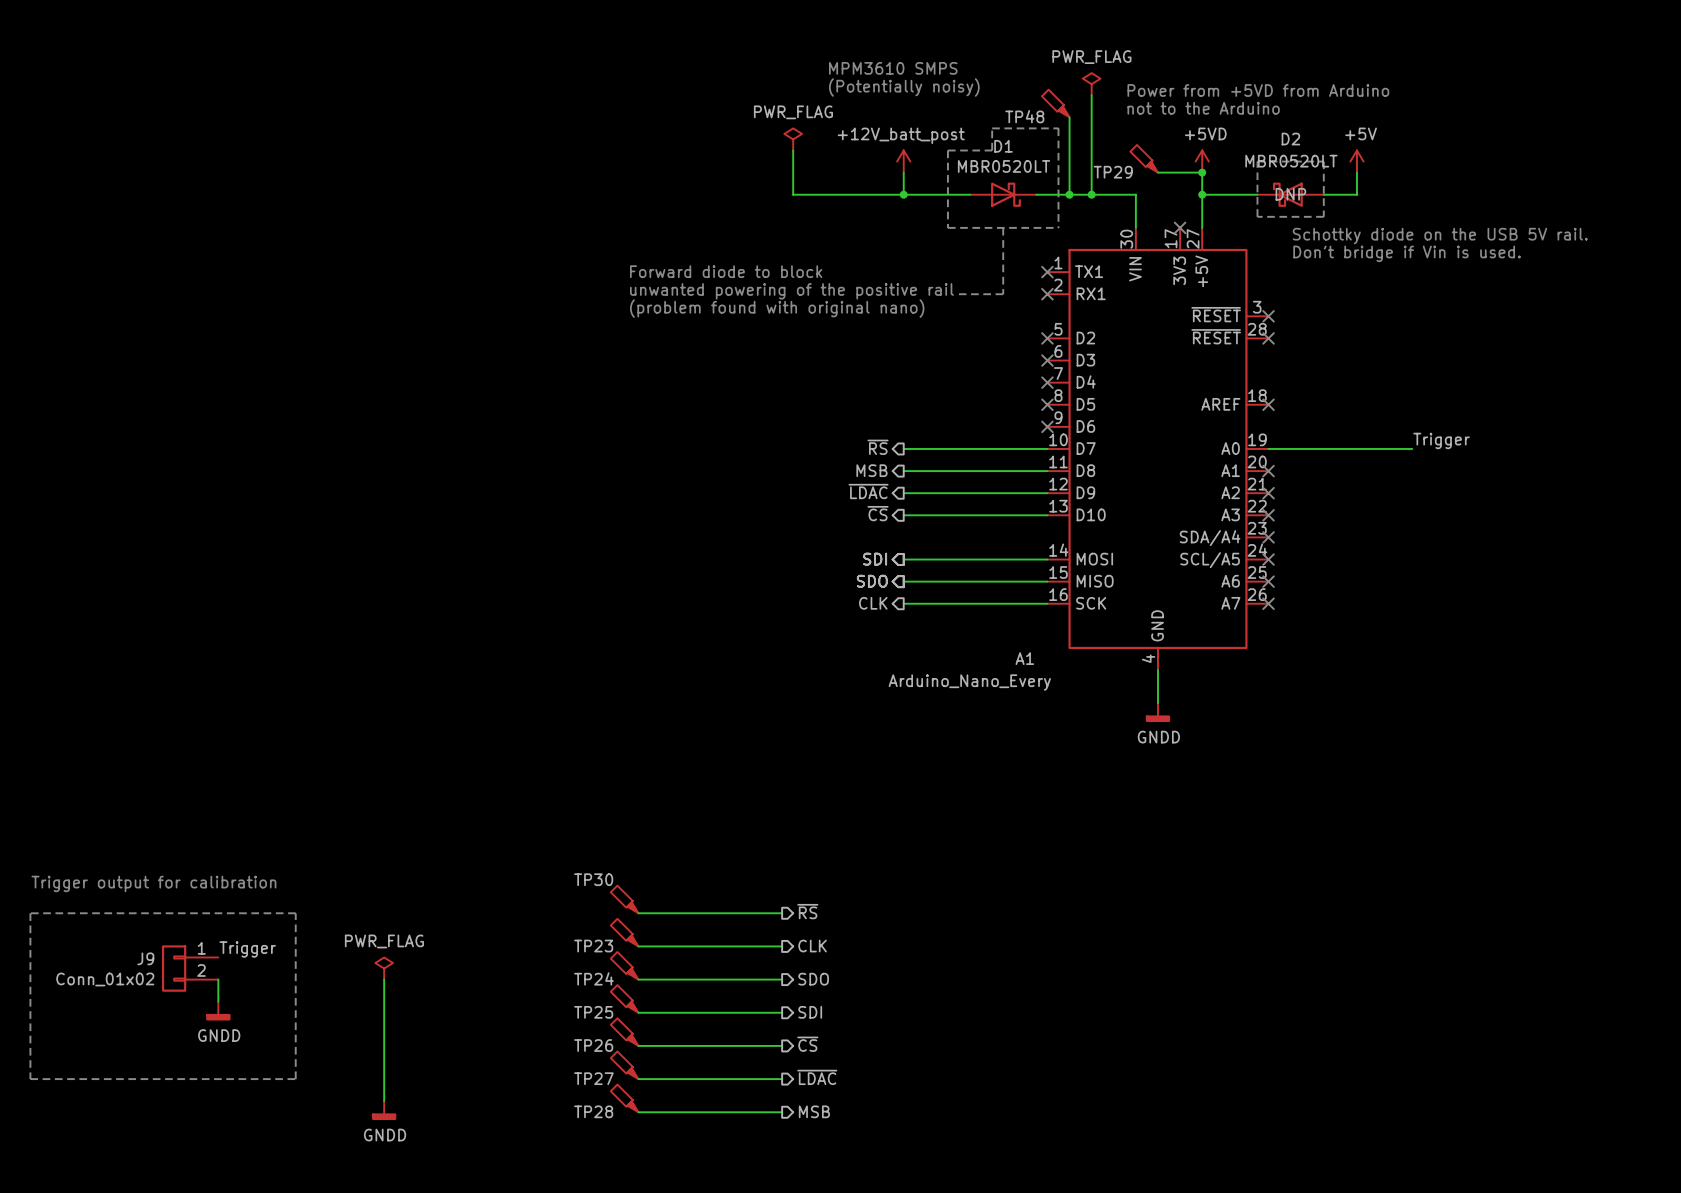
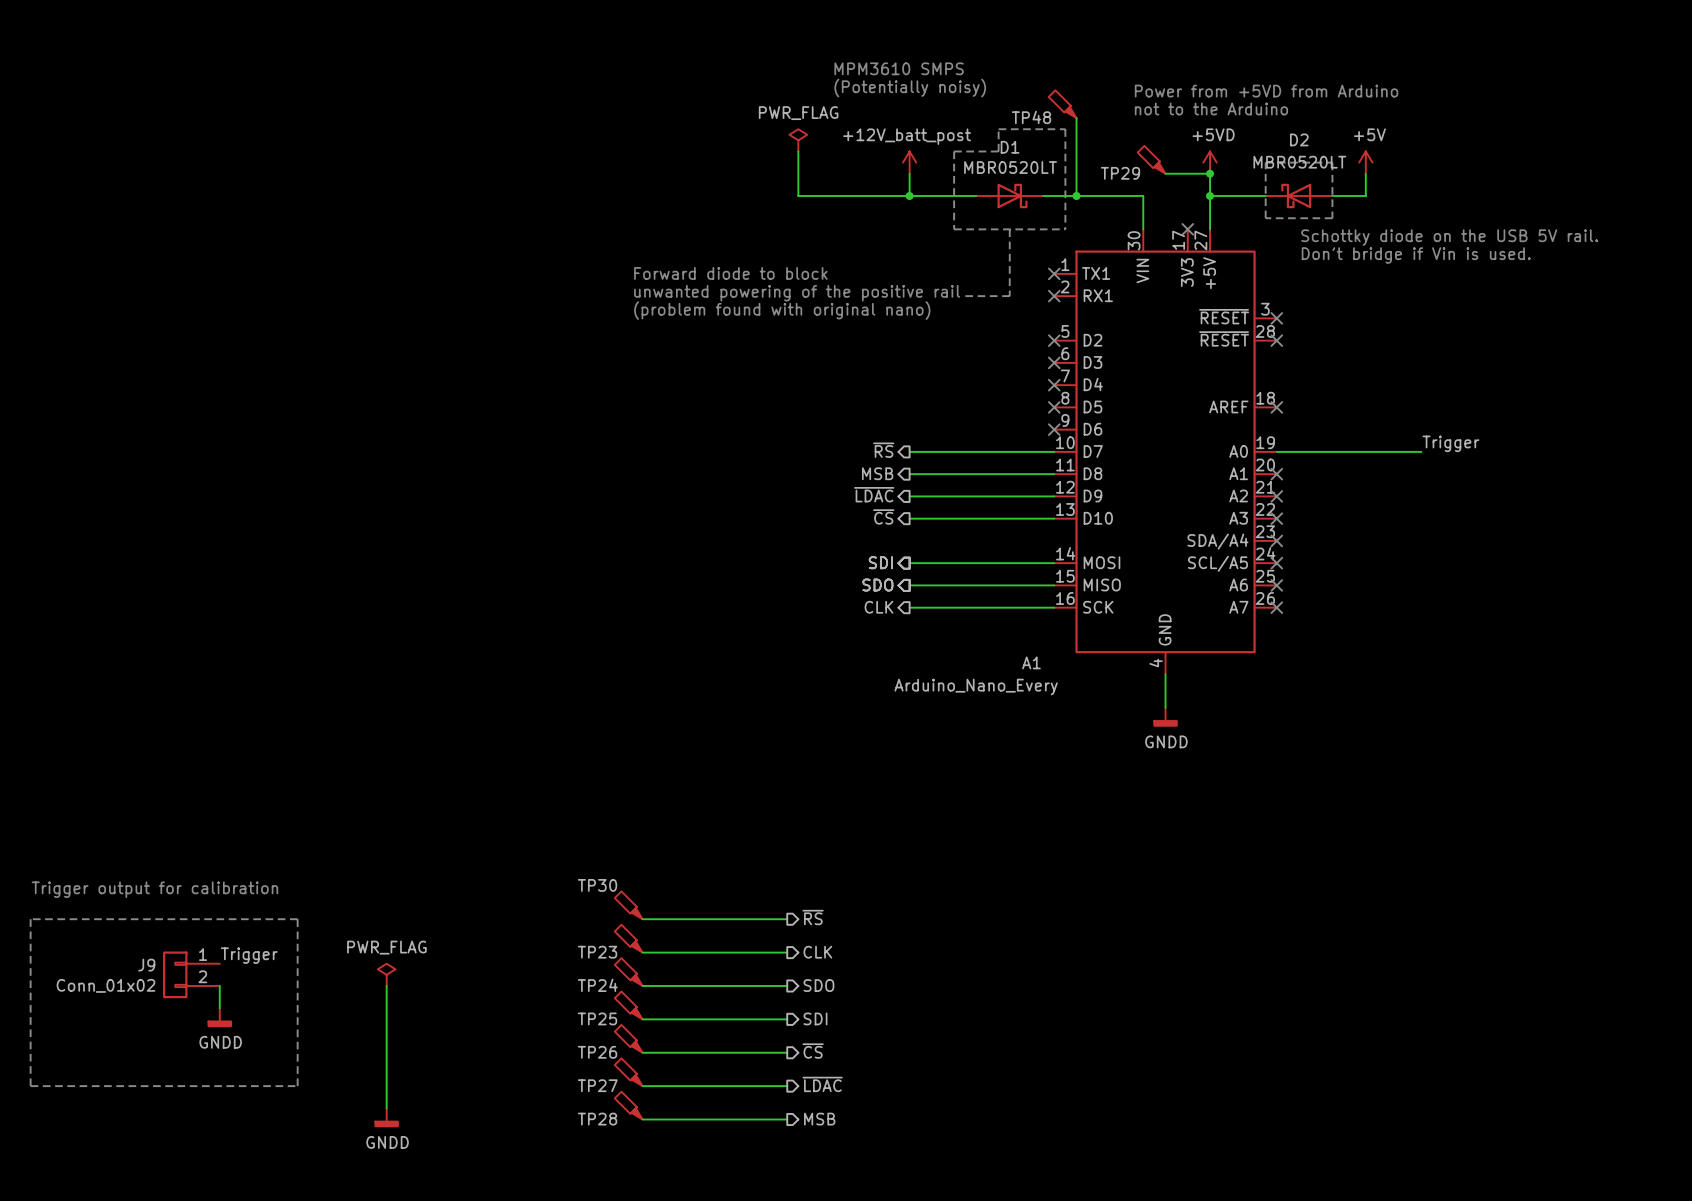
power symbol: PWR_FLAG (1091, 84) -> none
wire: (1091, 95) (1091, 194) -> none
junction: (1091, 194) -> none
D2 text: DNP (1290, 194) -> none

